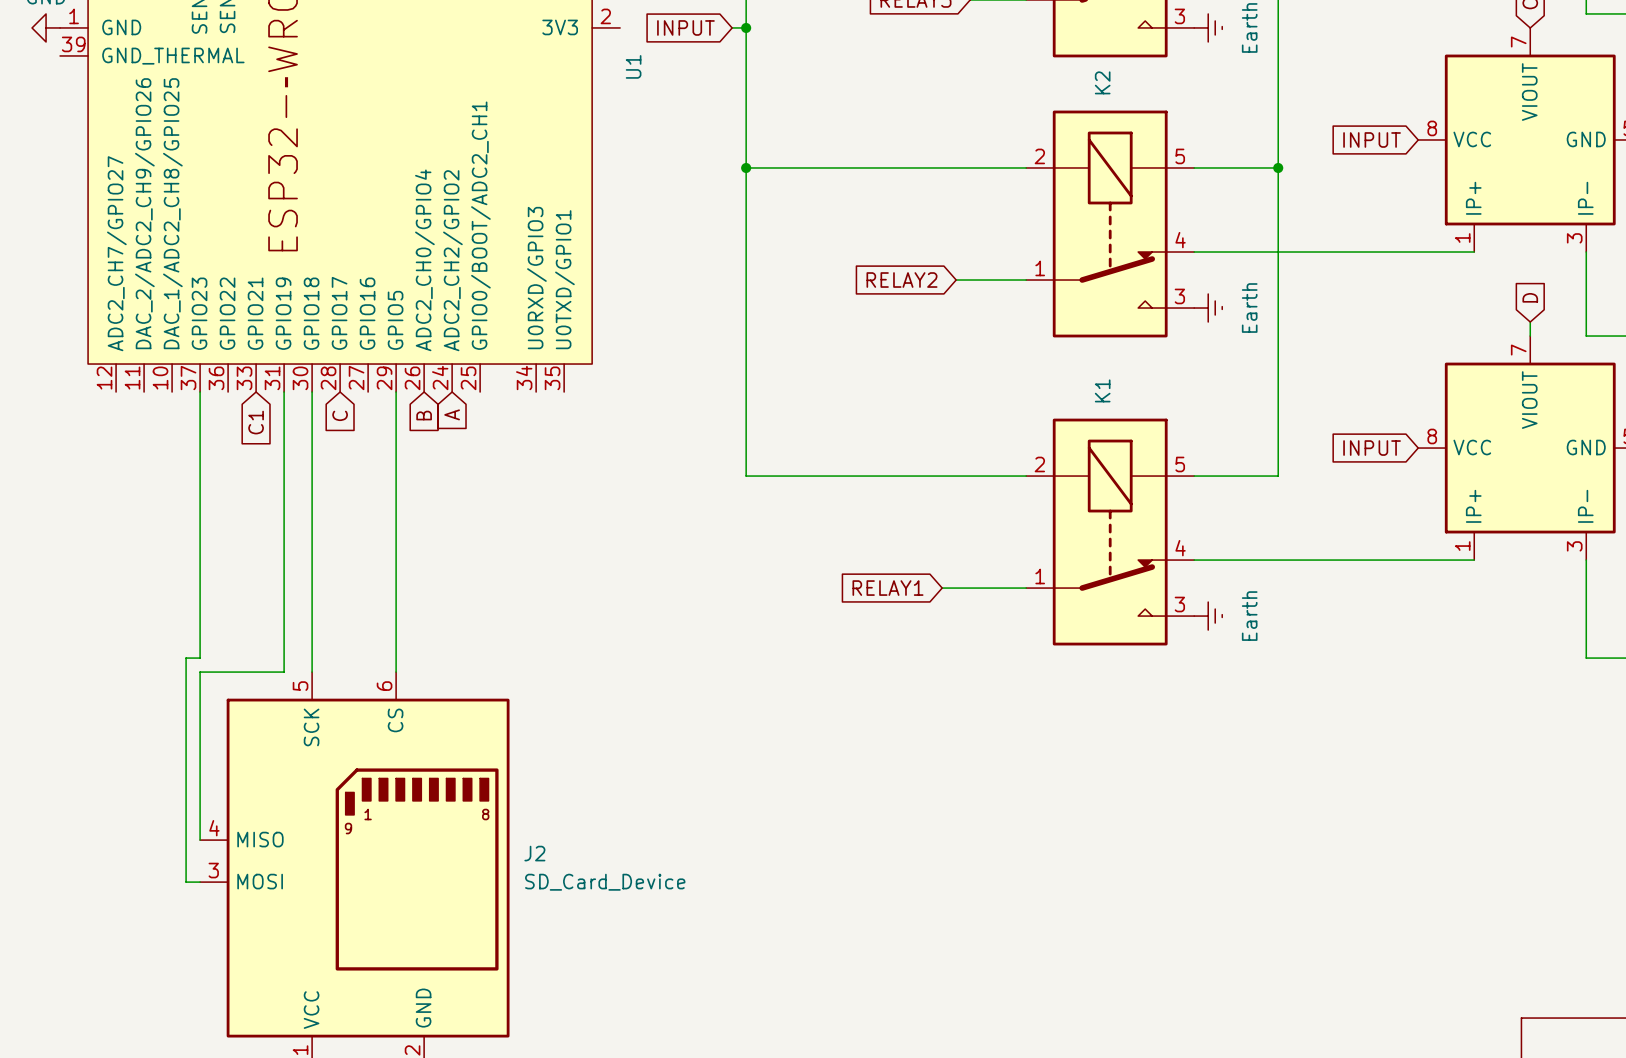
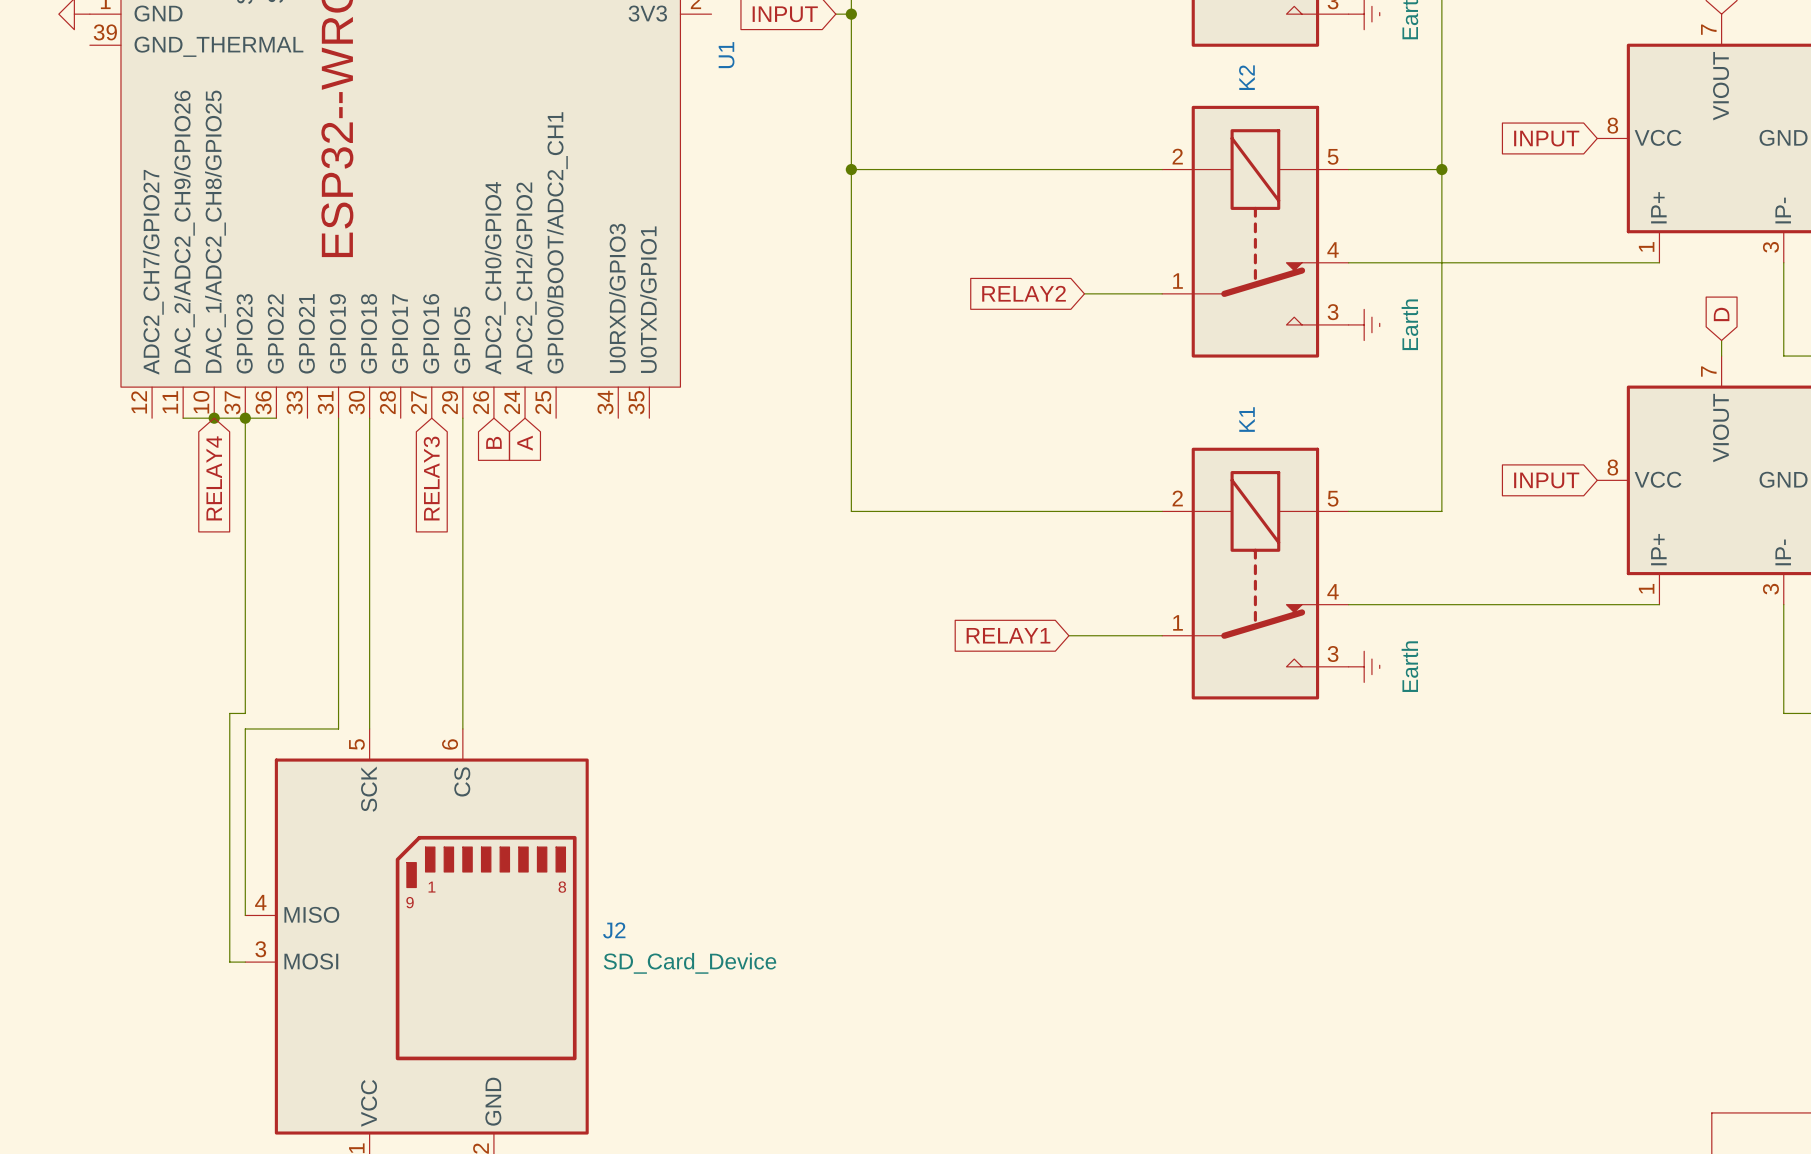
wire: none -> (183, 418) (276, 418)
junction: none -> (214, 418)
junction: none -> (245, 418)
global label: C (340, 415) -> none
global label: C1 (256, 422) -> none
global label: none -> RELAY4 (214, 478)
global label: none -> RELAY3 (431, 478)

